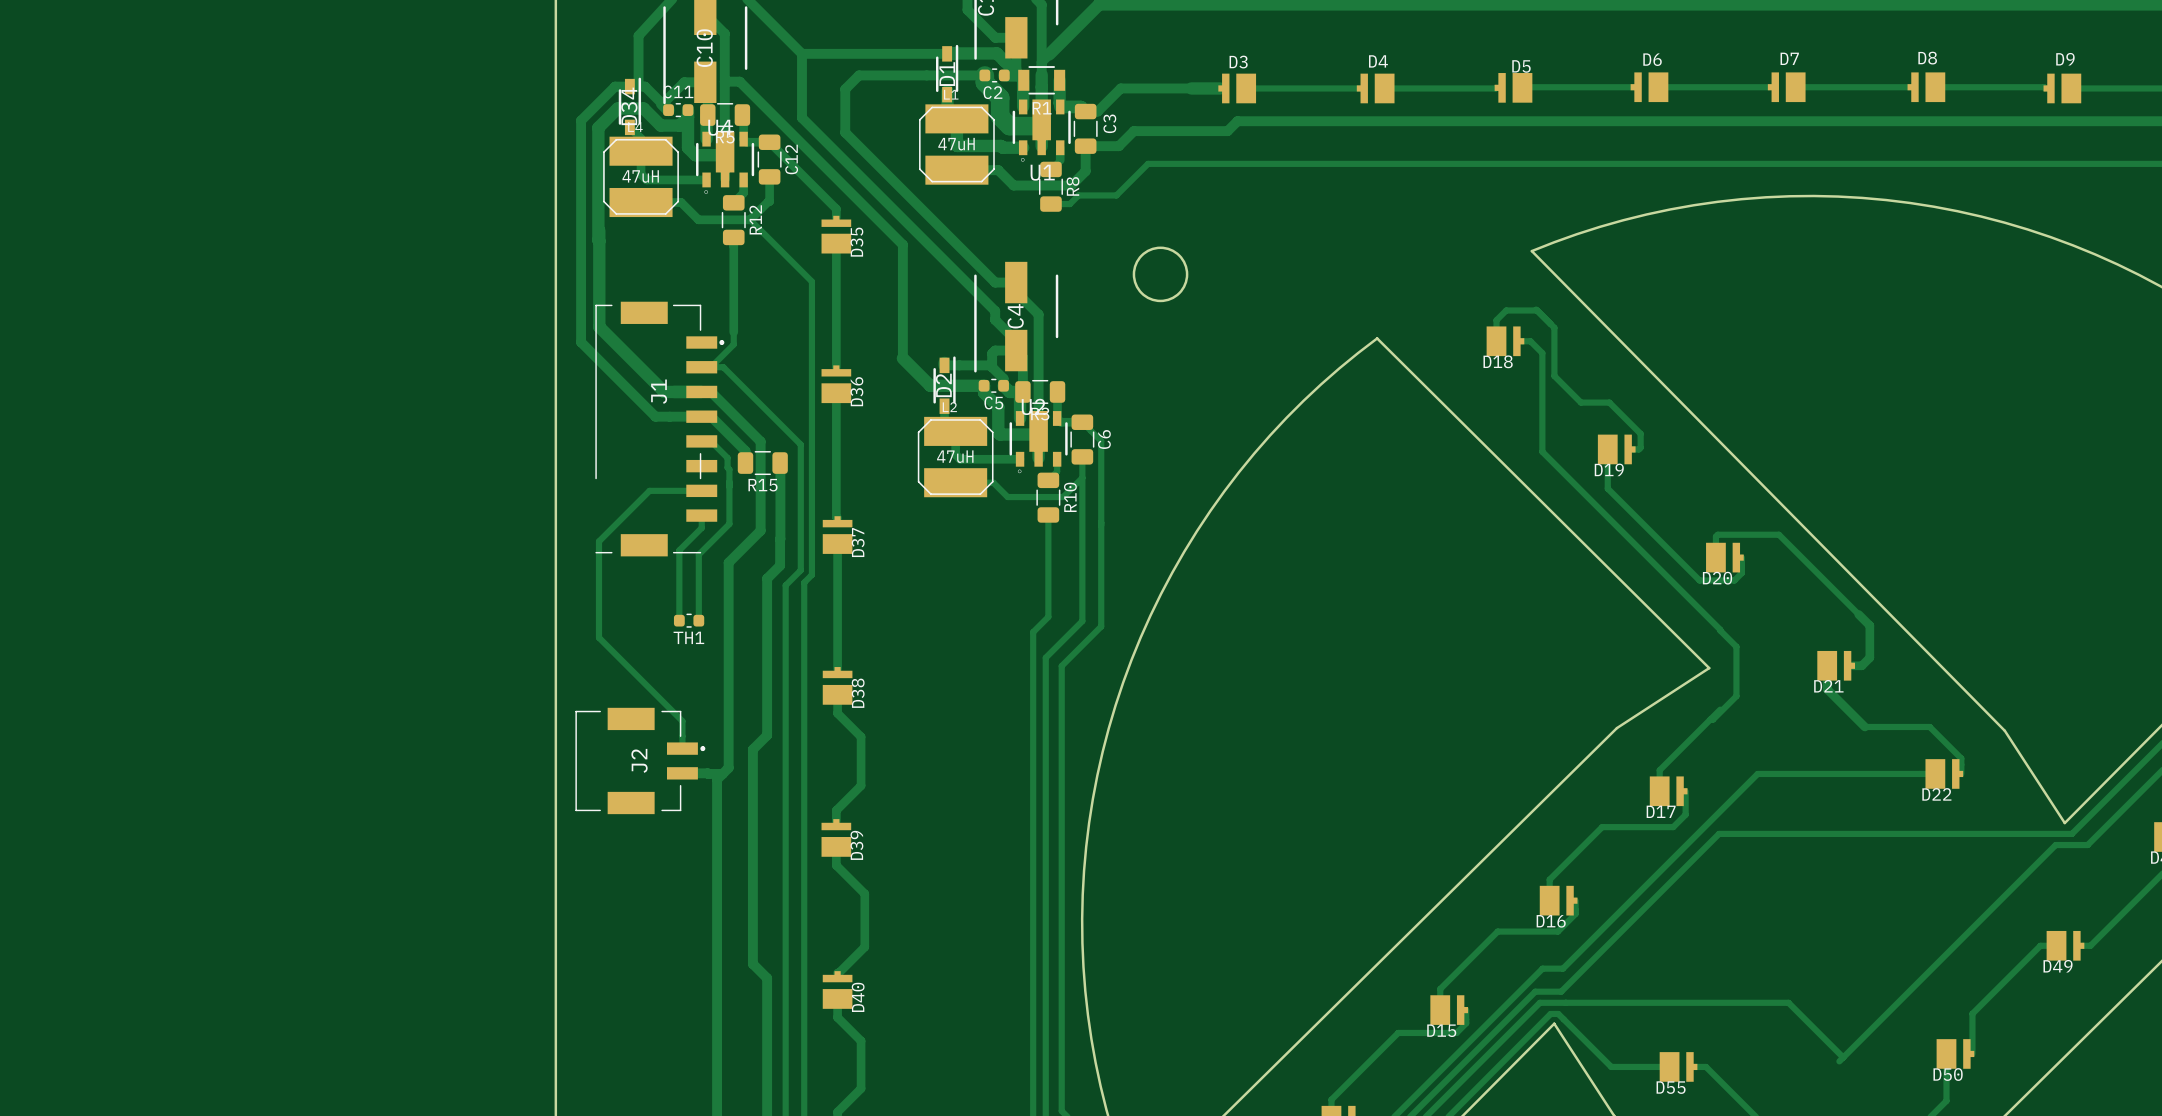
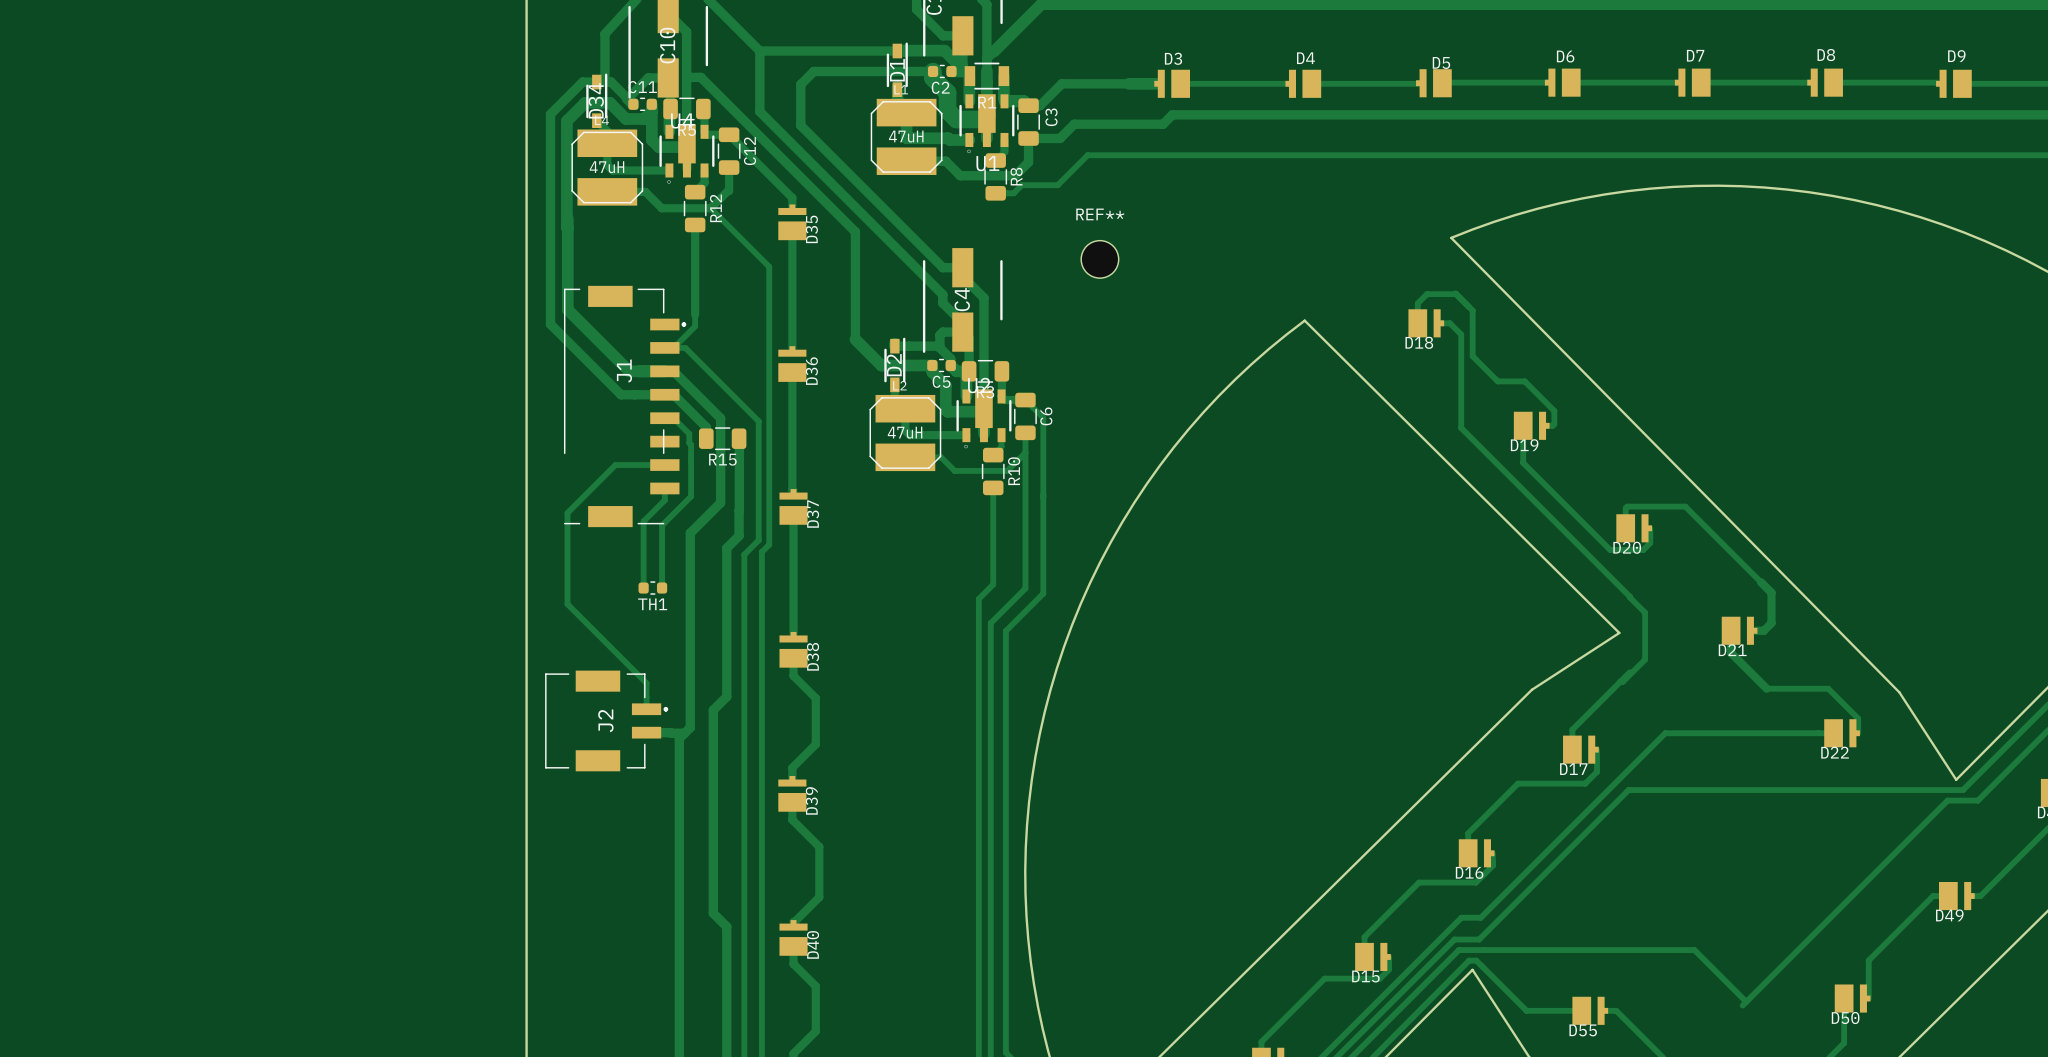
round board edge: [1132, 246, 1189, 303] -> none
REF**: none -> (1099, 259)

